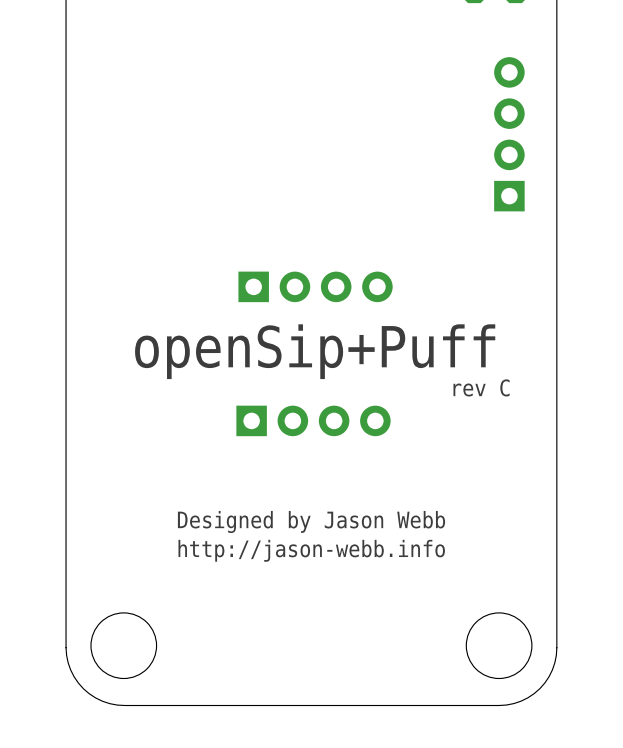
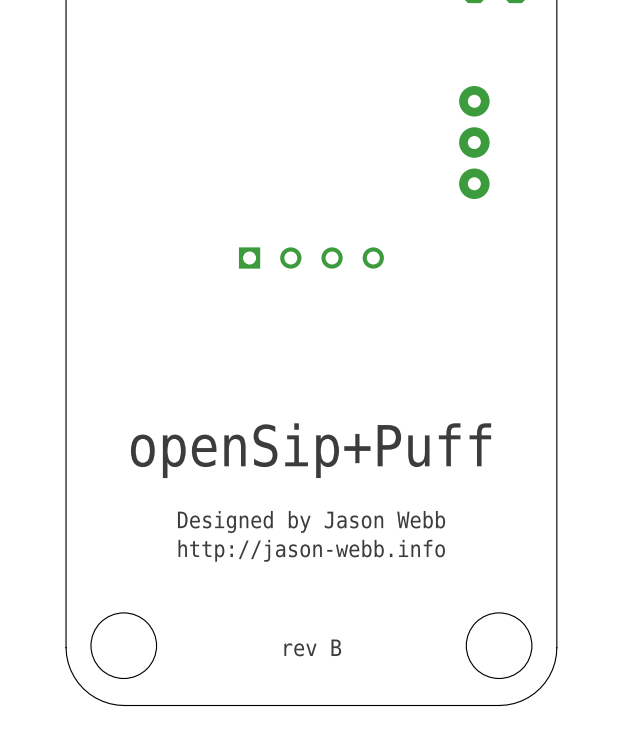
part: (509, 134) -> none
part: none -> (474, 142)
part: none -> (311, 258)
part: (315, 286) -> none
text position: openSip+Puff (315, 351) -> openSip+Puff (311, 450)
text: rev C (481, 387) -> none
part: (313, 420) -> none
text: none -> rev B (312, 647)

